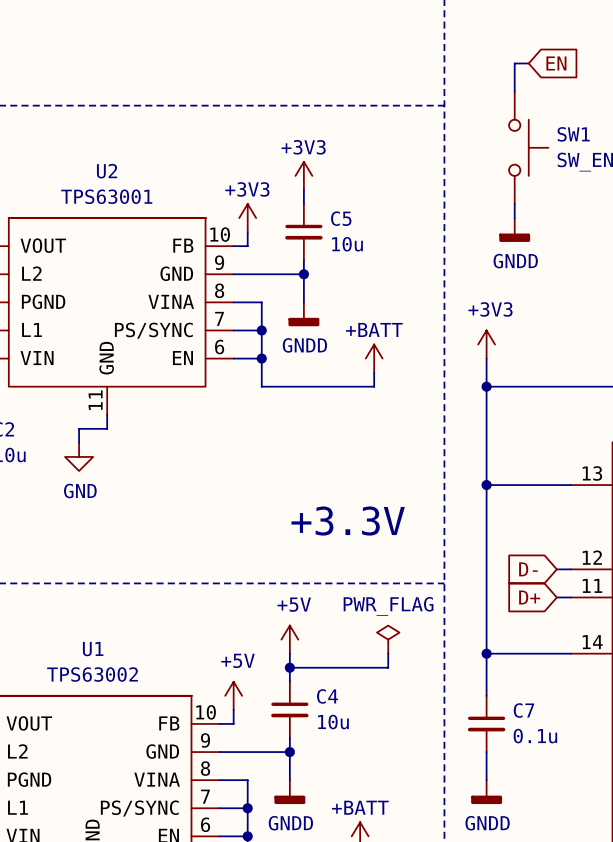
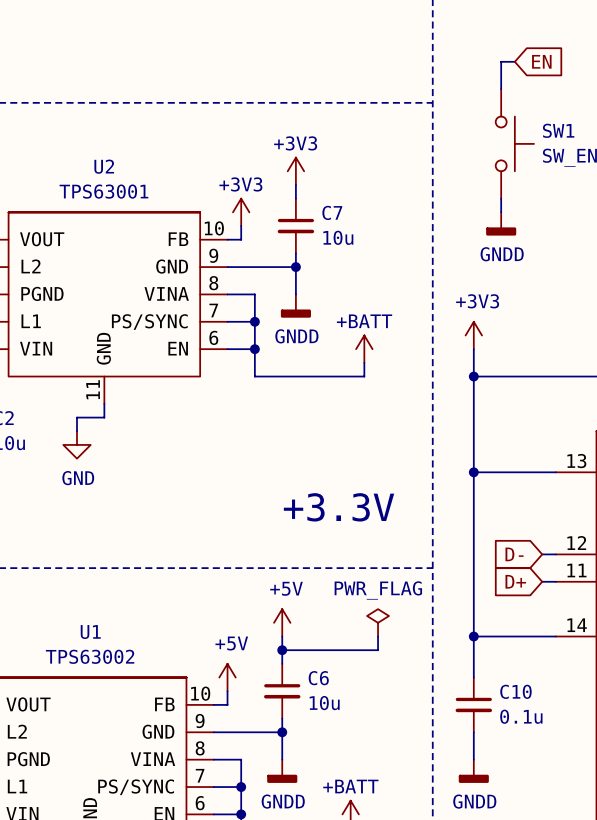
C5 name: C5 (341, 218) -> C7 (332, 212)
C4 name: C4 (327, 696) -> C6 (318, 678)
C7 name: C7 (523, 710) -> C10 (515, 691)

